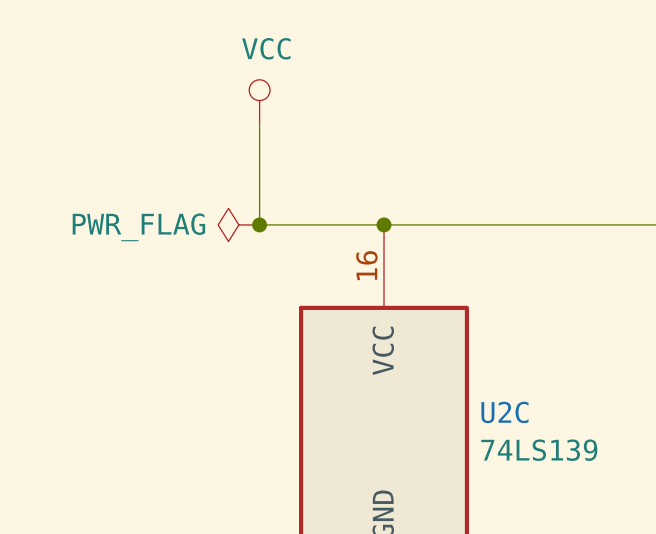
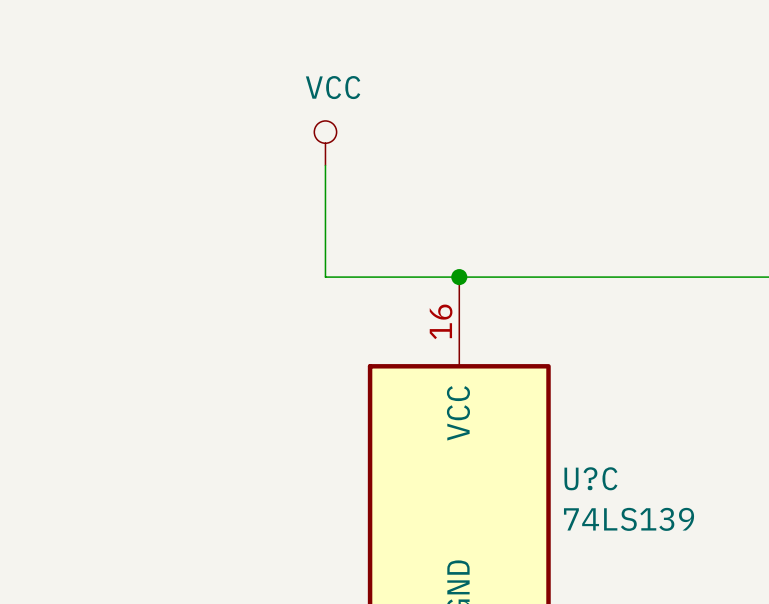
power symbol: PWR_FLAG (238, 224) -> none
junction: (259, 224) -> none
U2C name: U2C (504, 412) -> U?C (590, 478)

